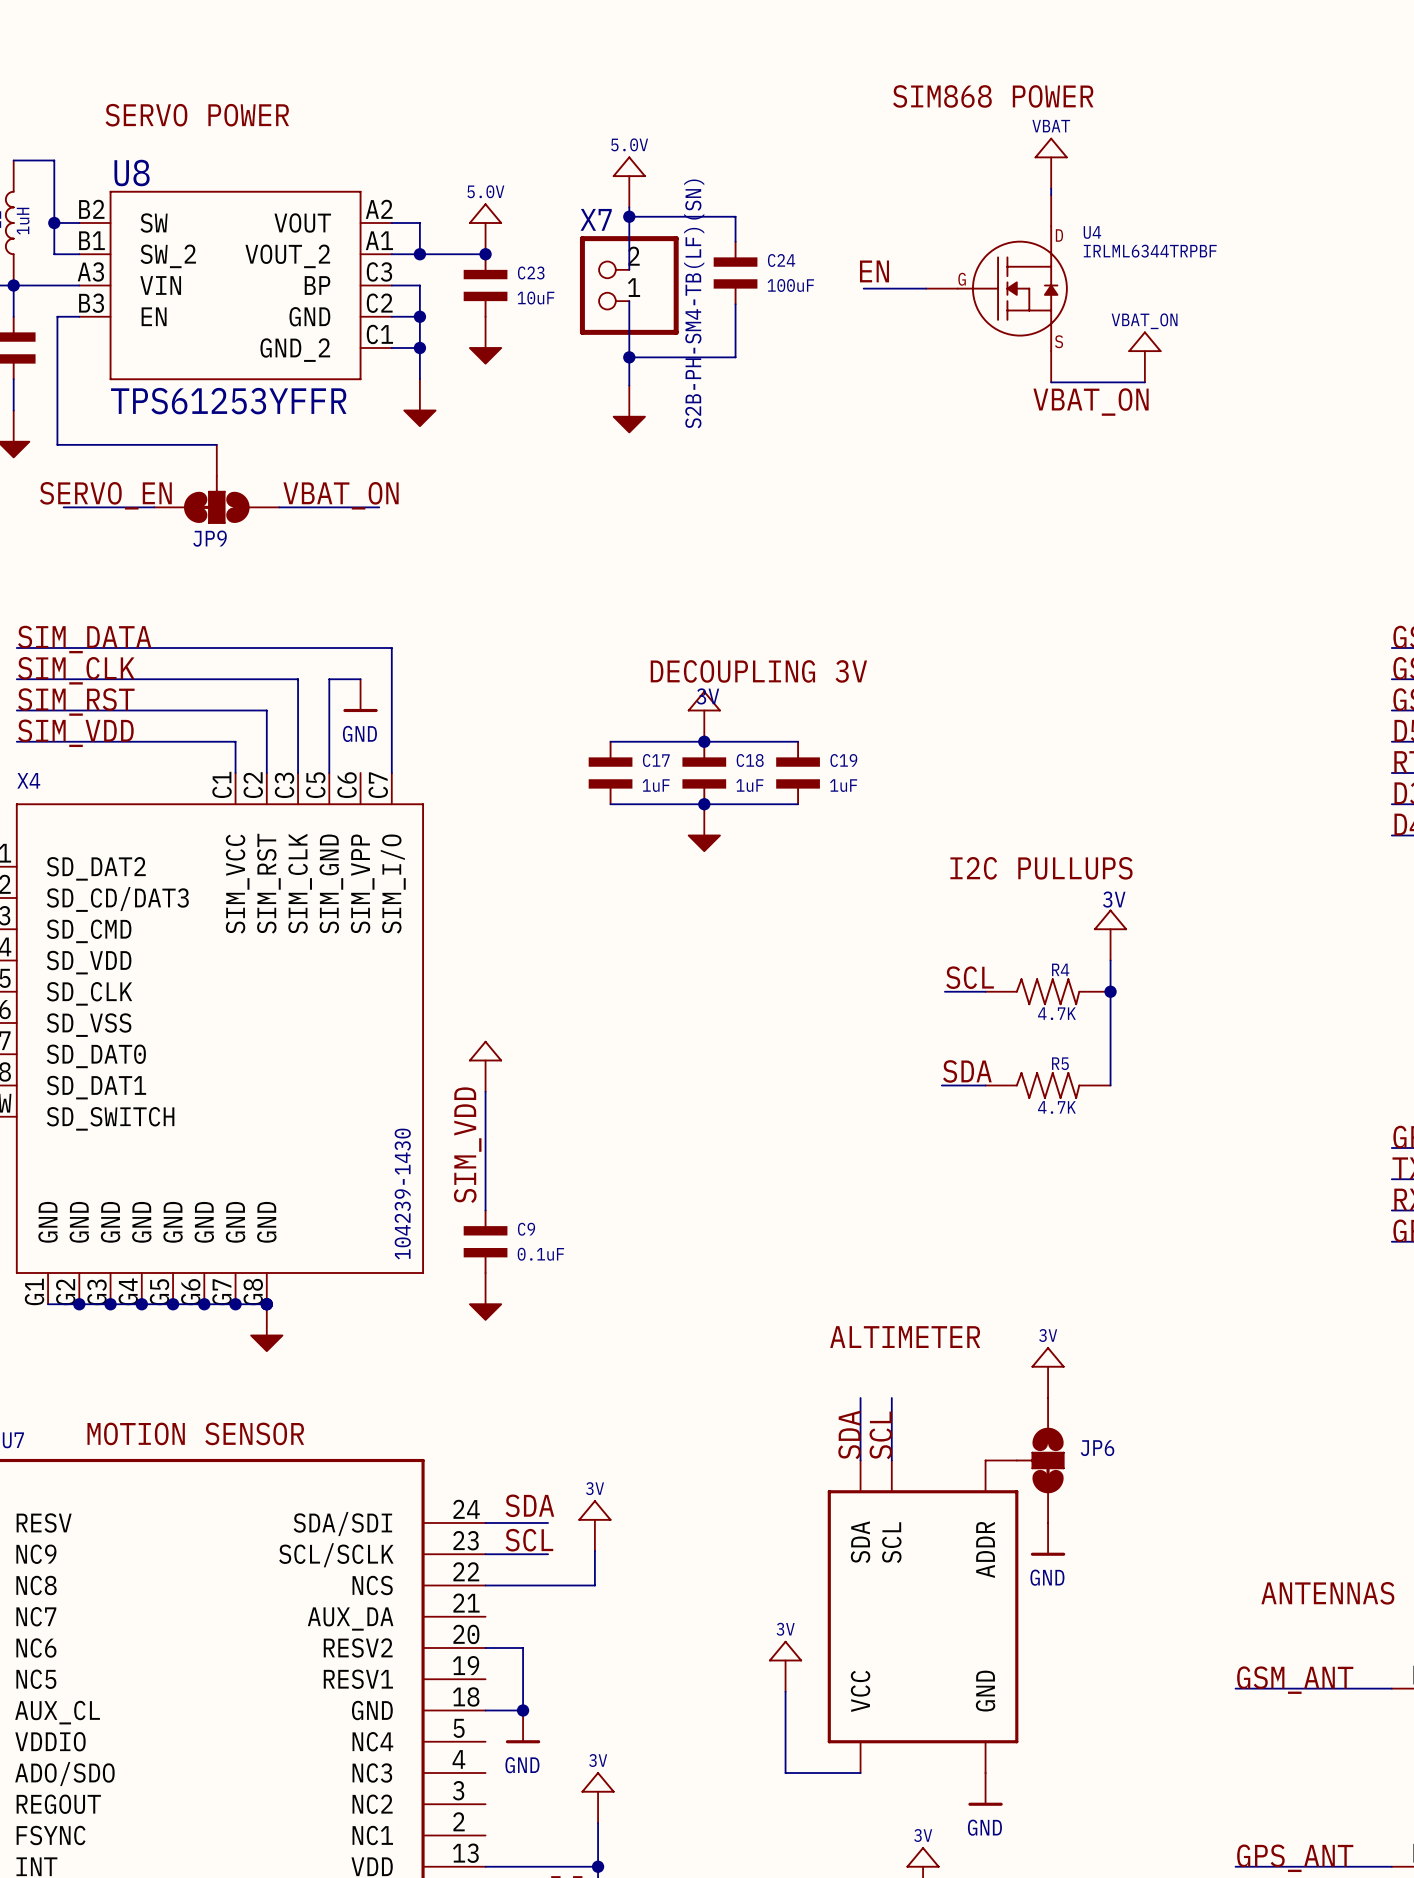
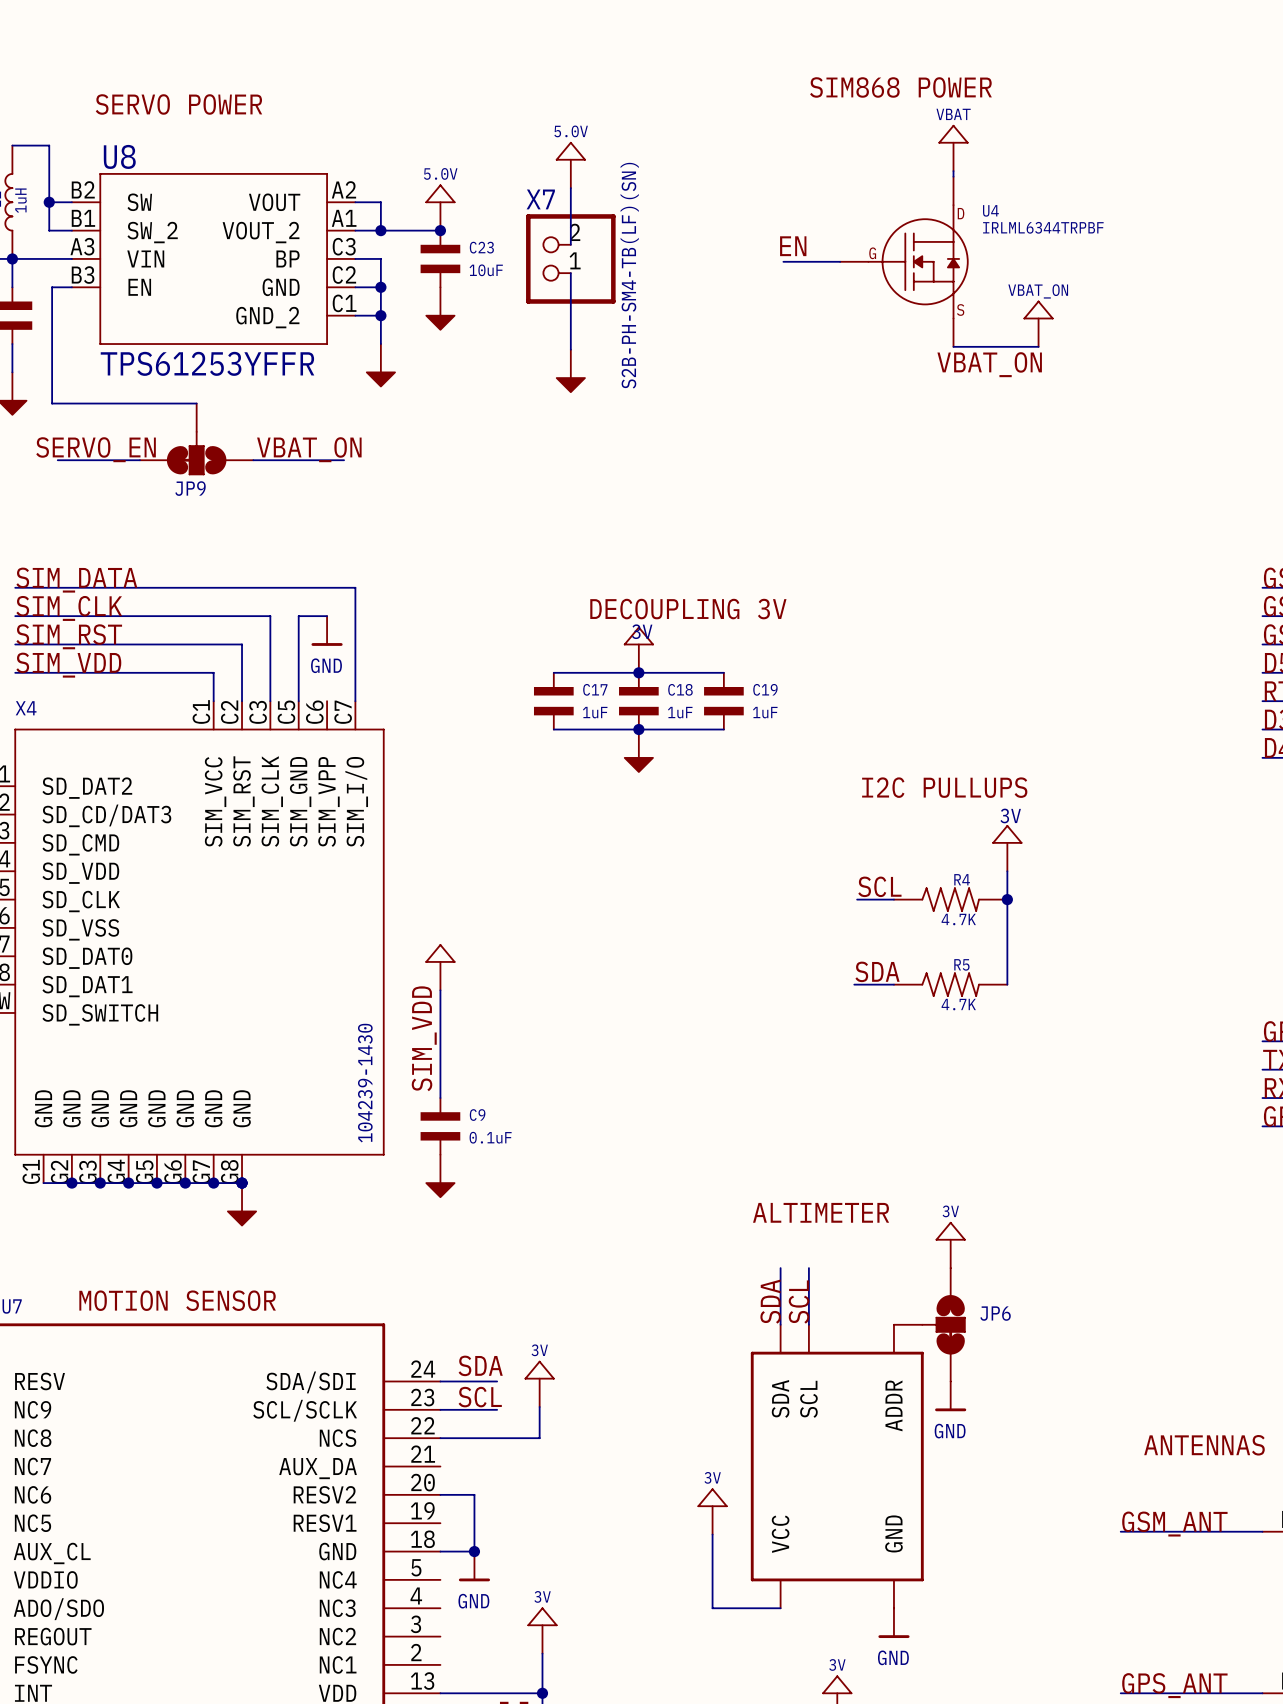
wire: (629, 216) (735, 216) (735, 241) -> none
junction: (629, 216) -> none
C24: 100uF (735, 273) -> none
wire: (735, 304) (735, 357) (629, 357) -> none
junction: (629, 357) -> none

